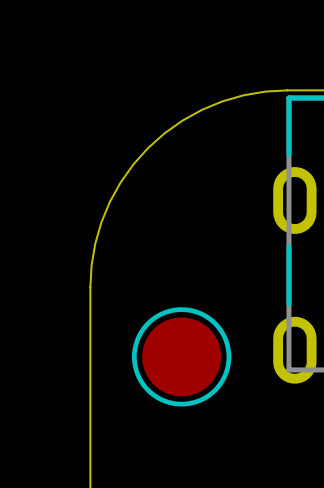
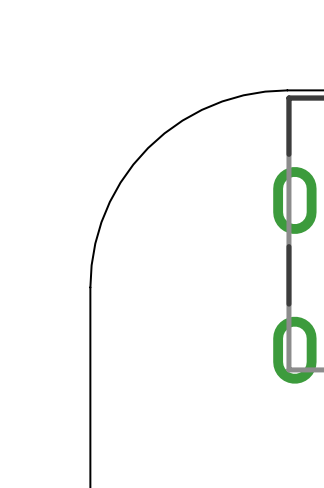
part: (181, 356) -> none

